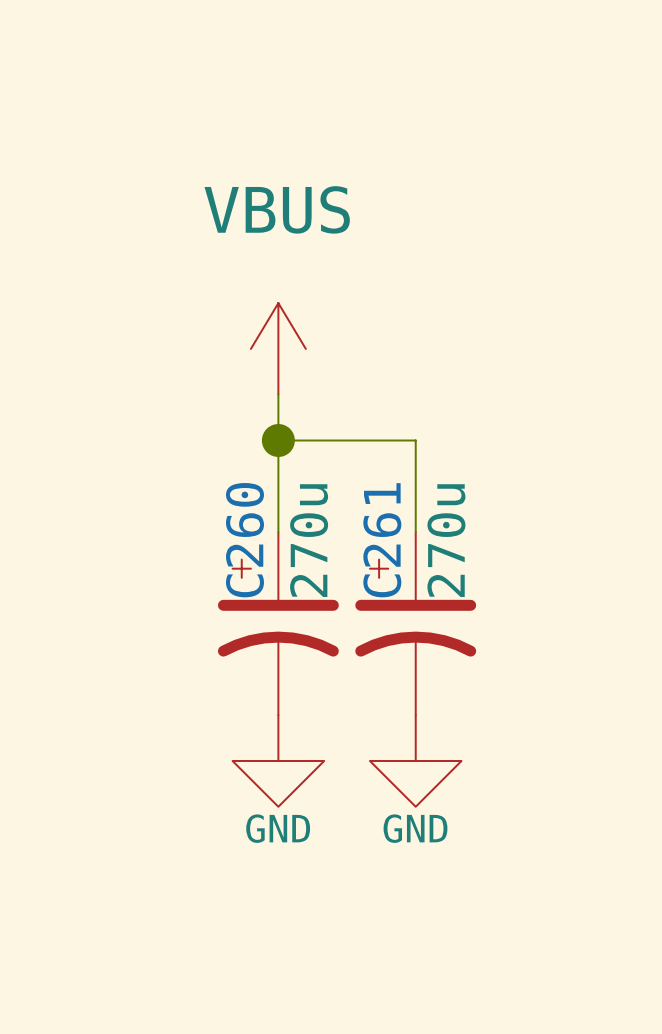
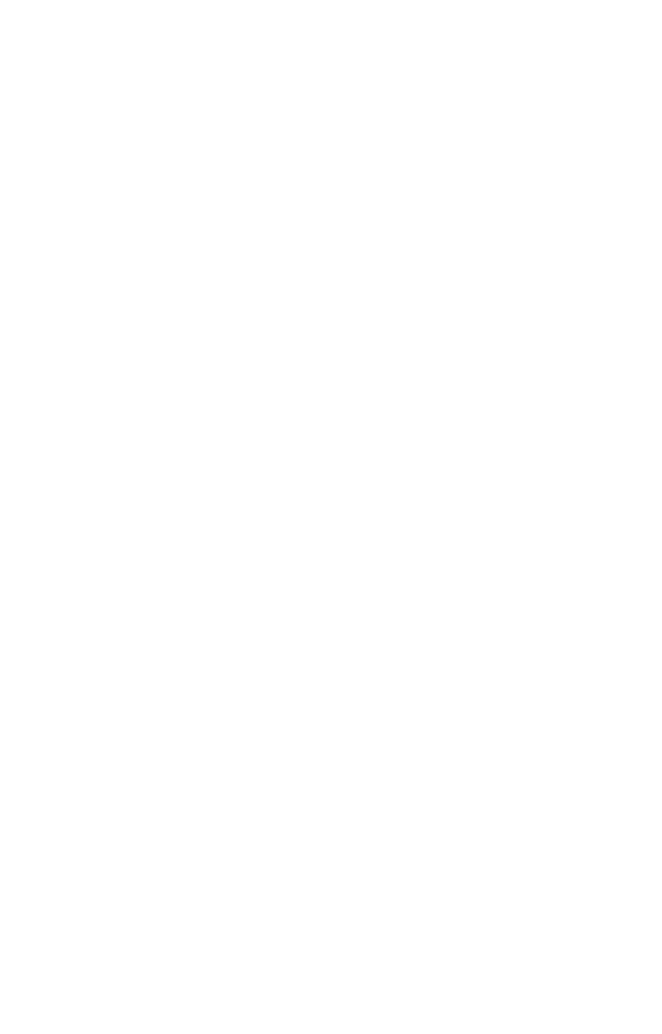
power symbol: VBUS (278, 348) -> none
wire: (278, 394) (278, 532) -> none
wire: (278, 440) (415, 440) (415, 532) -> none
junction: (278, 440) -> none
C260: 270u (278, 623) -> none
C261: 270u (415, 623) -> none
power symbol: GND (278, 760) -> none
power symbol: GND (415, 760) -> none

